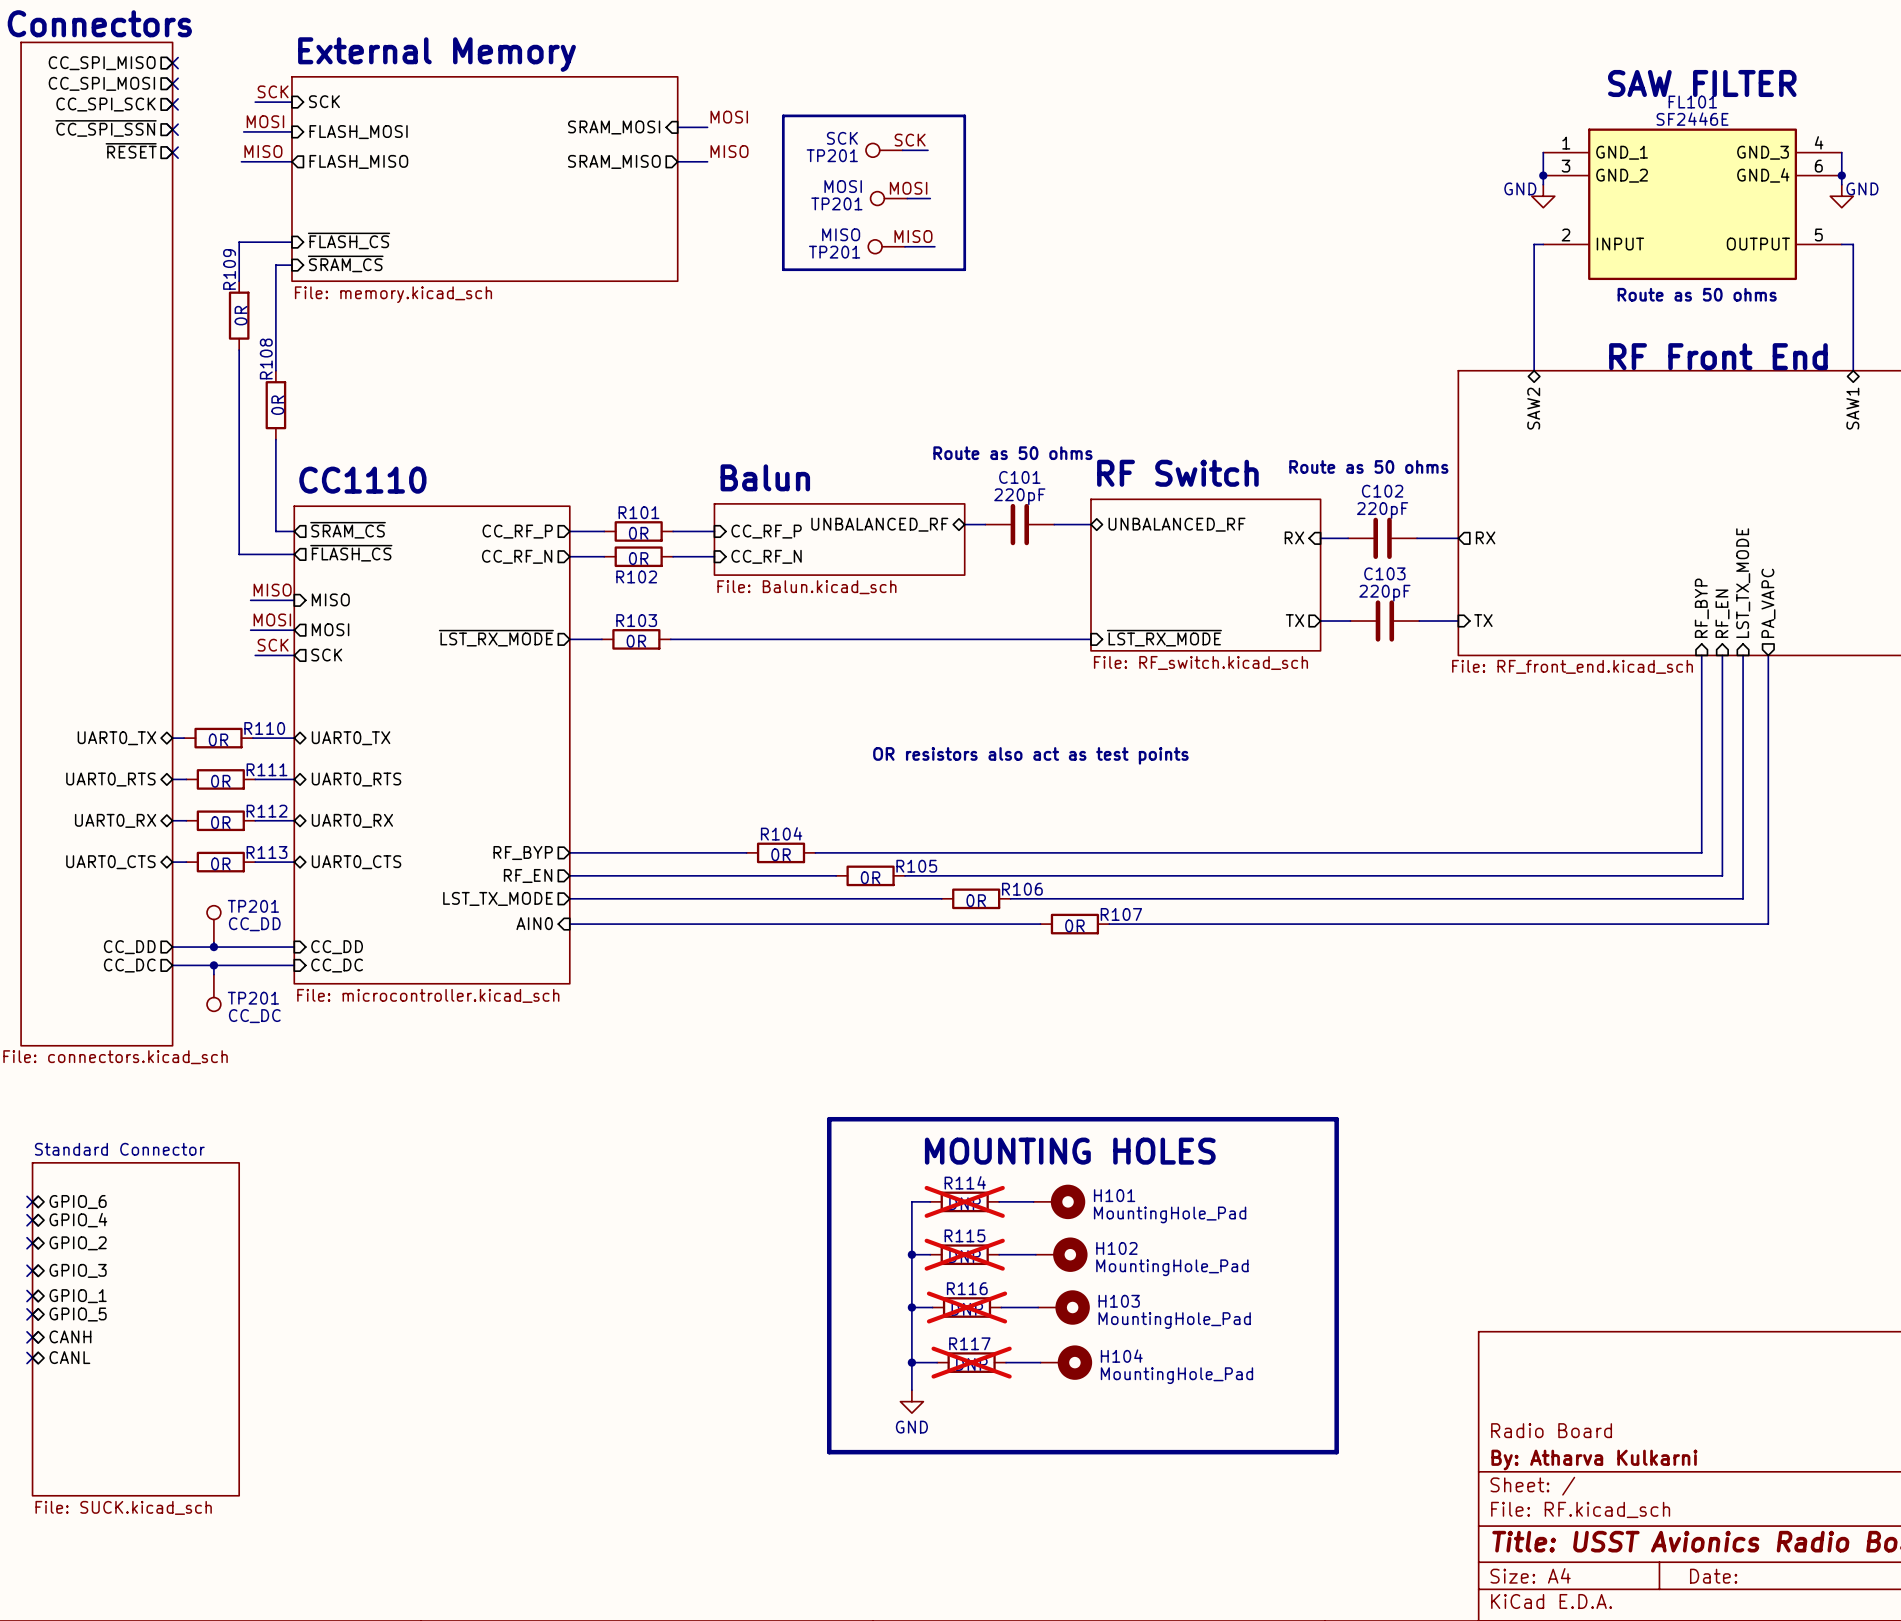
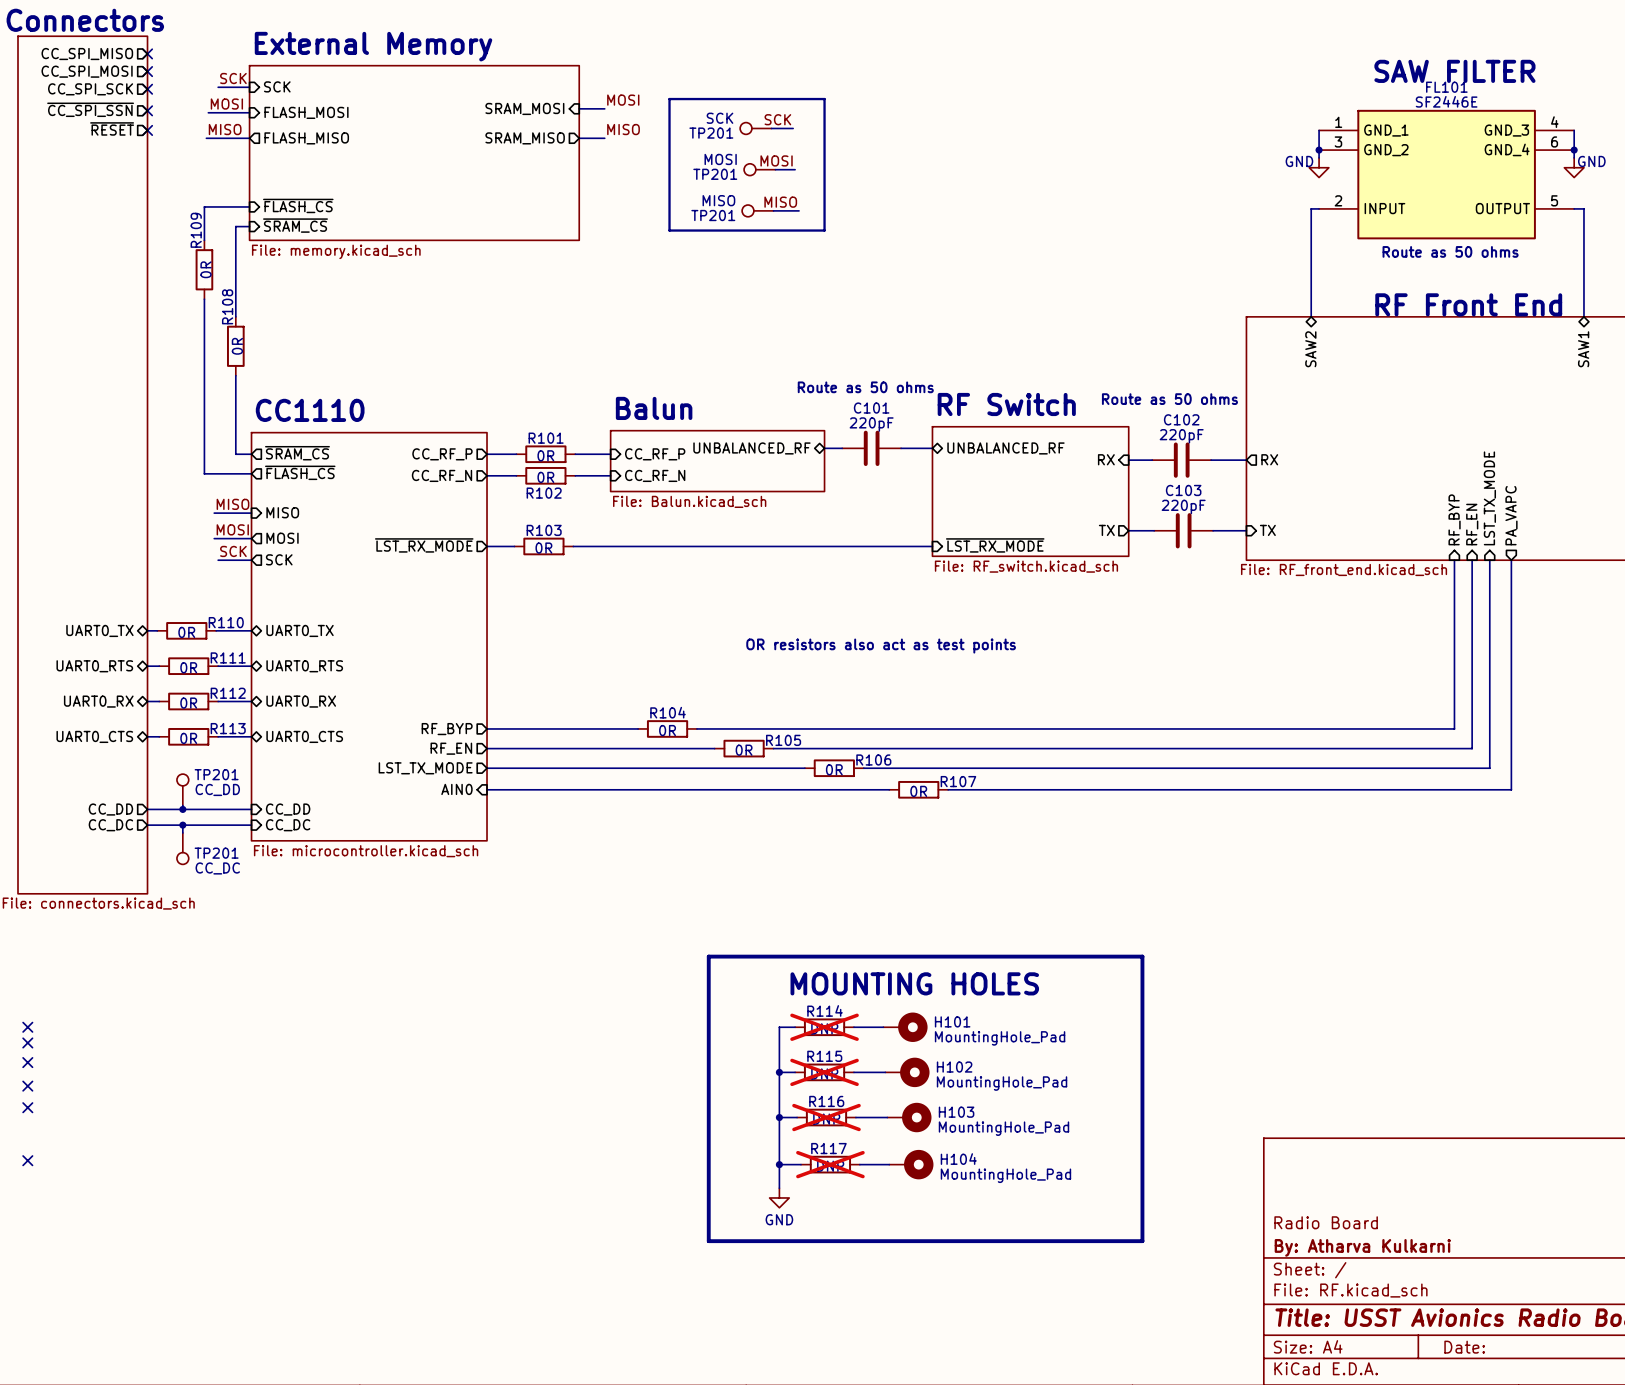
sheet pin: GPIO_6 (78, 1202) -> none
sheet pin: GPIO_4 (78, 1220) -> none
sheet pin: GPIO_2 (78, 1243) -> none
sheet pin: GPIO_3 (78, 1270) -> none
sheet pin: GPIO_1 (78, 1296) -> none
no-connect mark: (32, 1314) -> none
sheet pin: GPIO_5 (78, 1314) -> none
sheet Standard Connector: File: SUCK.kicad_sch (135, 1329) -> none
sheet pin: CANH (70, 1336) -> none
no-connect mark: (32, 1337) -> none
sheet pin: CANL (69, 1357) -> none

